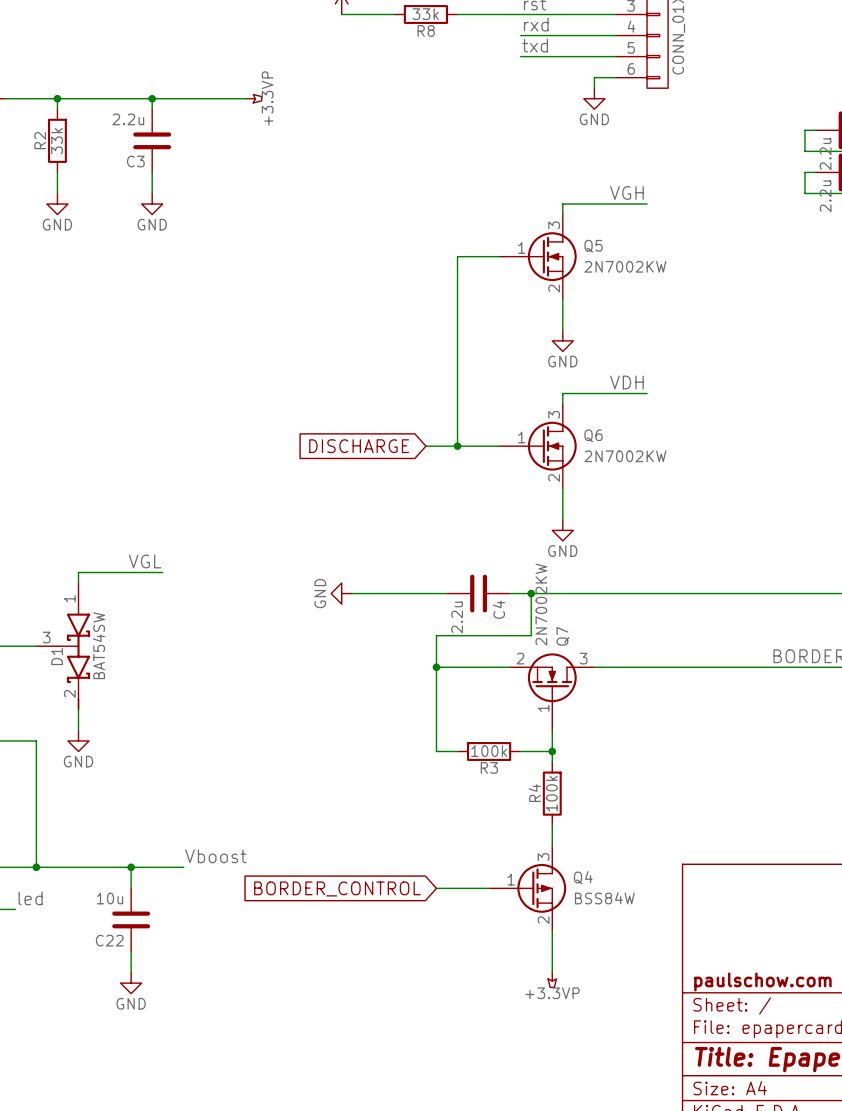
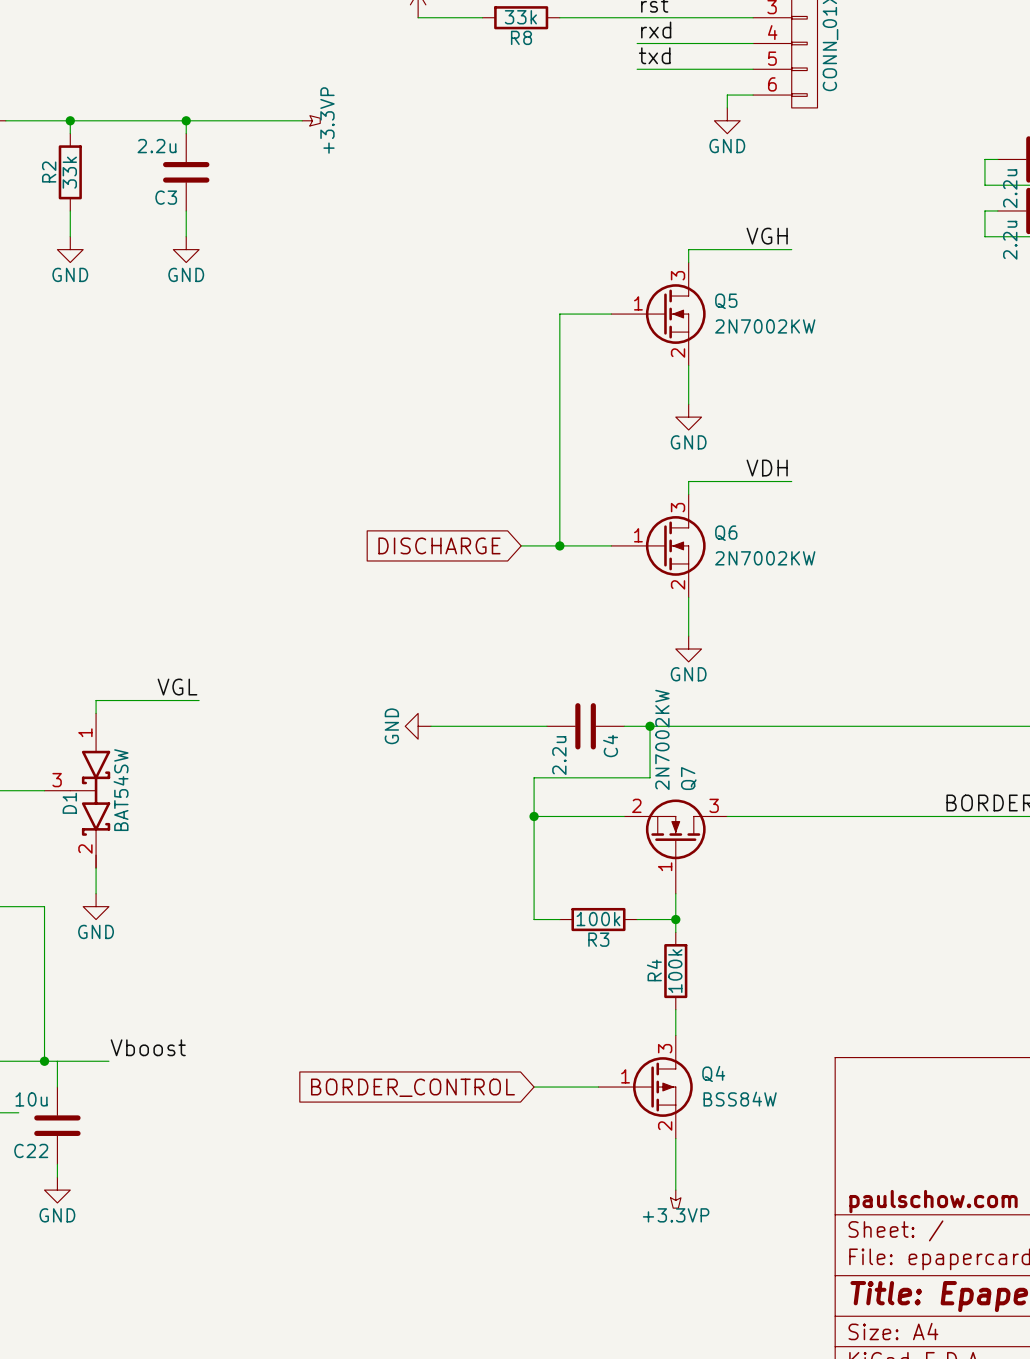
label position: Vboost (215, 856) -> Vboost (148, 1047)
wire: (89, 867) (183, 867) -> none
wire: (131, 867) (131, 888) -> (57, 1061) (57, 1087)
junction: (131, 867) -> none
label: led (30, 898) -> none
C22 position: (131, 919) -> (57, 1125)
wire: none -> (57, 1164) (57, 1177)
wire: (131, 951) (131, 972) -> none
power symbol position: GND (131, 983) -> GND (57, 1190)

